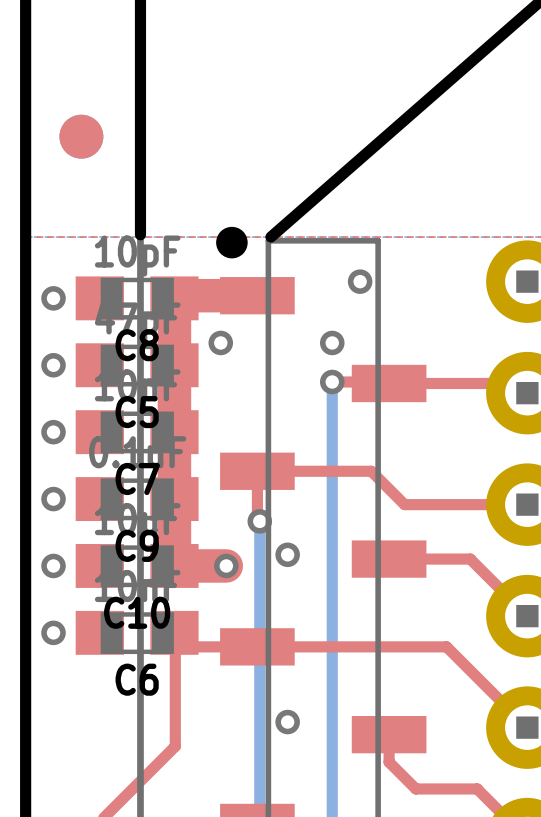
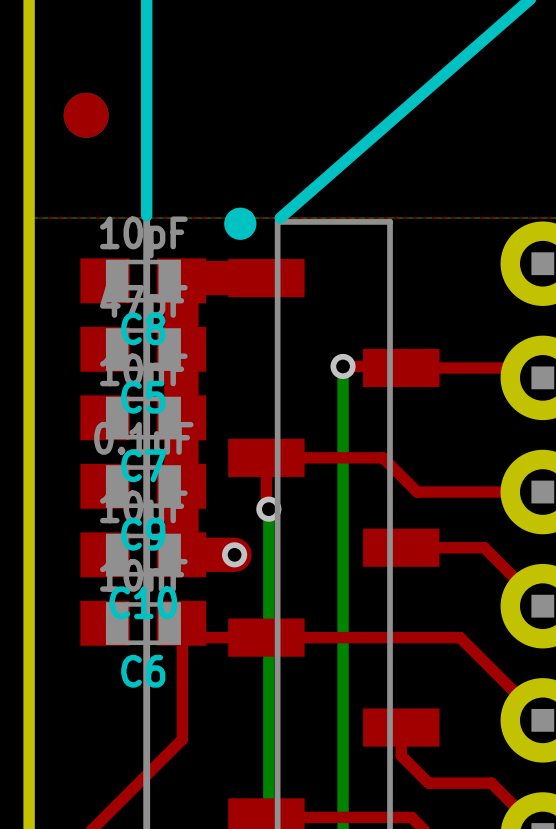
via: (360, 281) -> none
via: (53, 298) -> none
via: (220, 342) -> none
via: (332, 342) -> none
via: (53, 365) -> none
via: (53, 432) -> none
via: (53, 499) -> none
via: (287, 554) -> none
via: (53, 565) -> none
via: (53, 632) -> none
via: (287, 722) -> none

